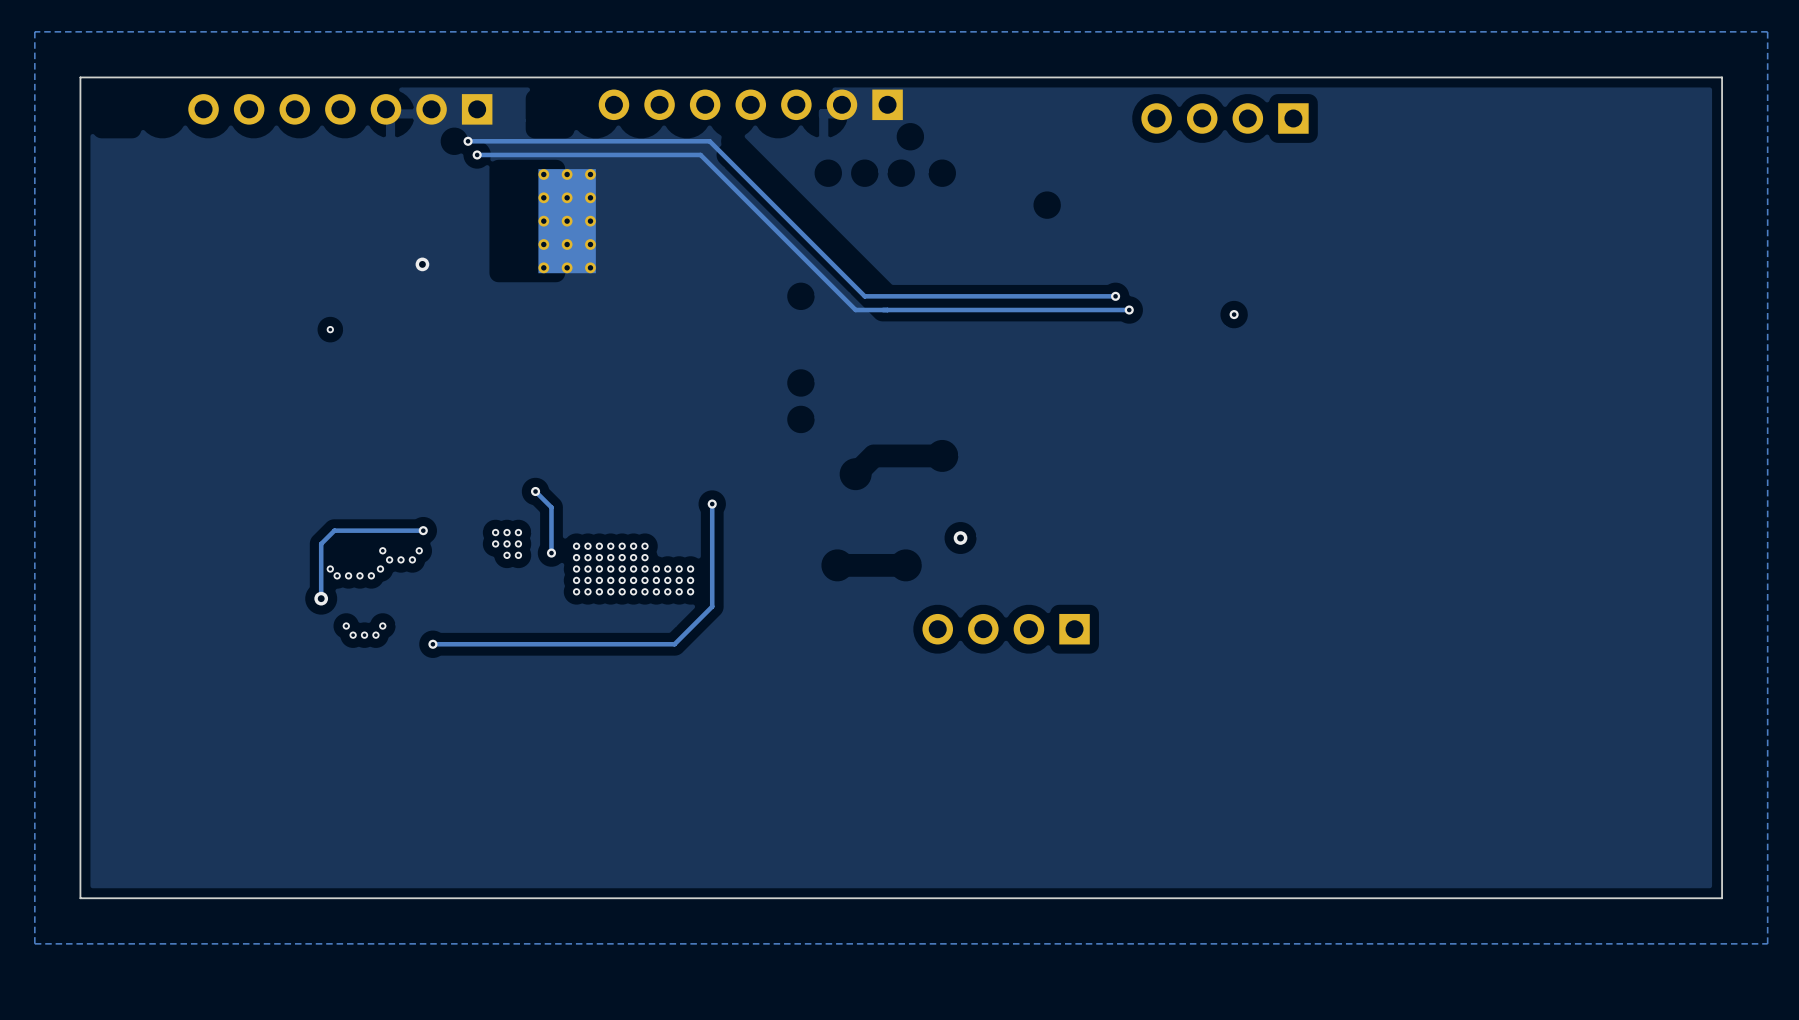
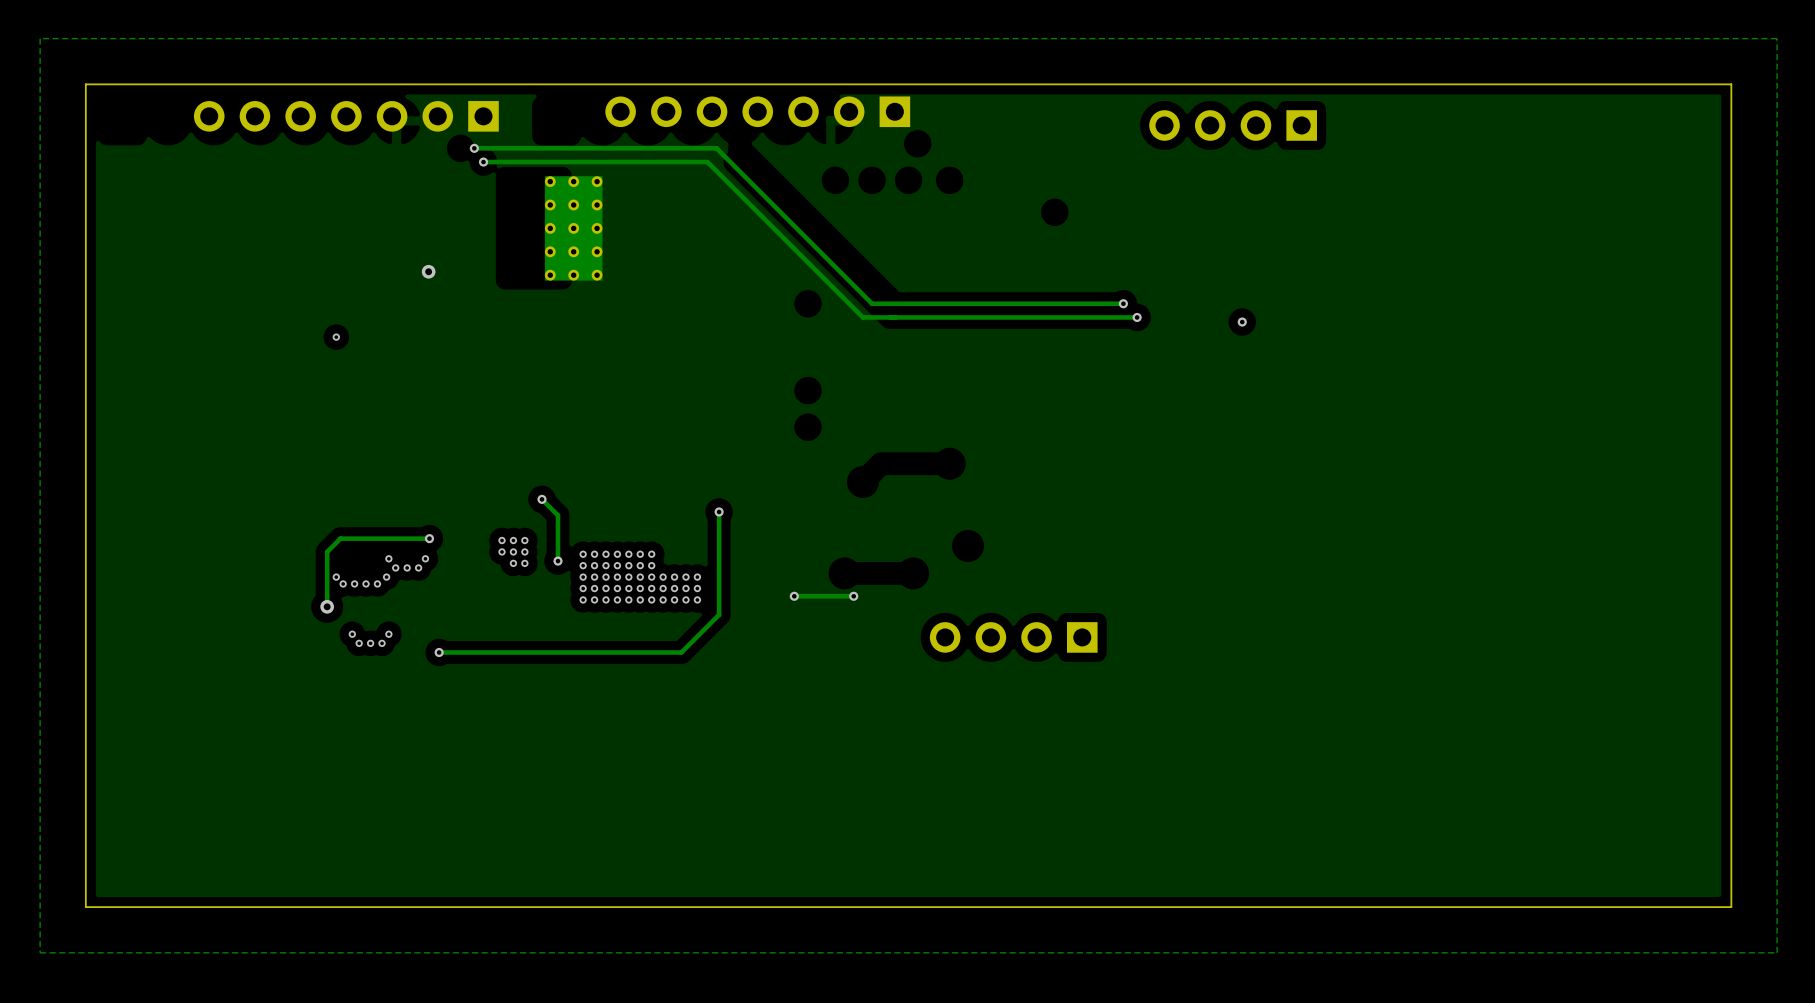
via: (960, 538) -> none
via: none -> (794, 596)
track: none -> (853, 596) (794, 596)
via: none -> (853, 596)

